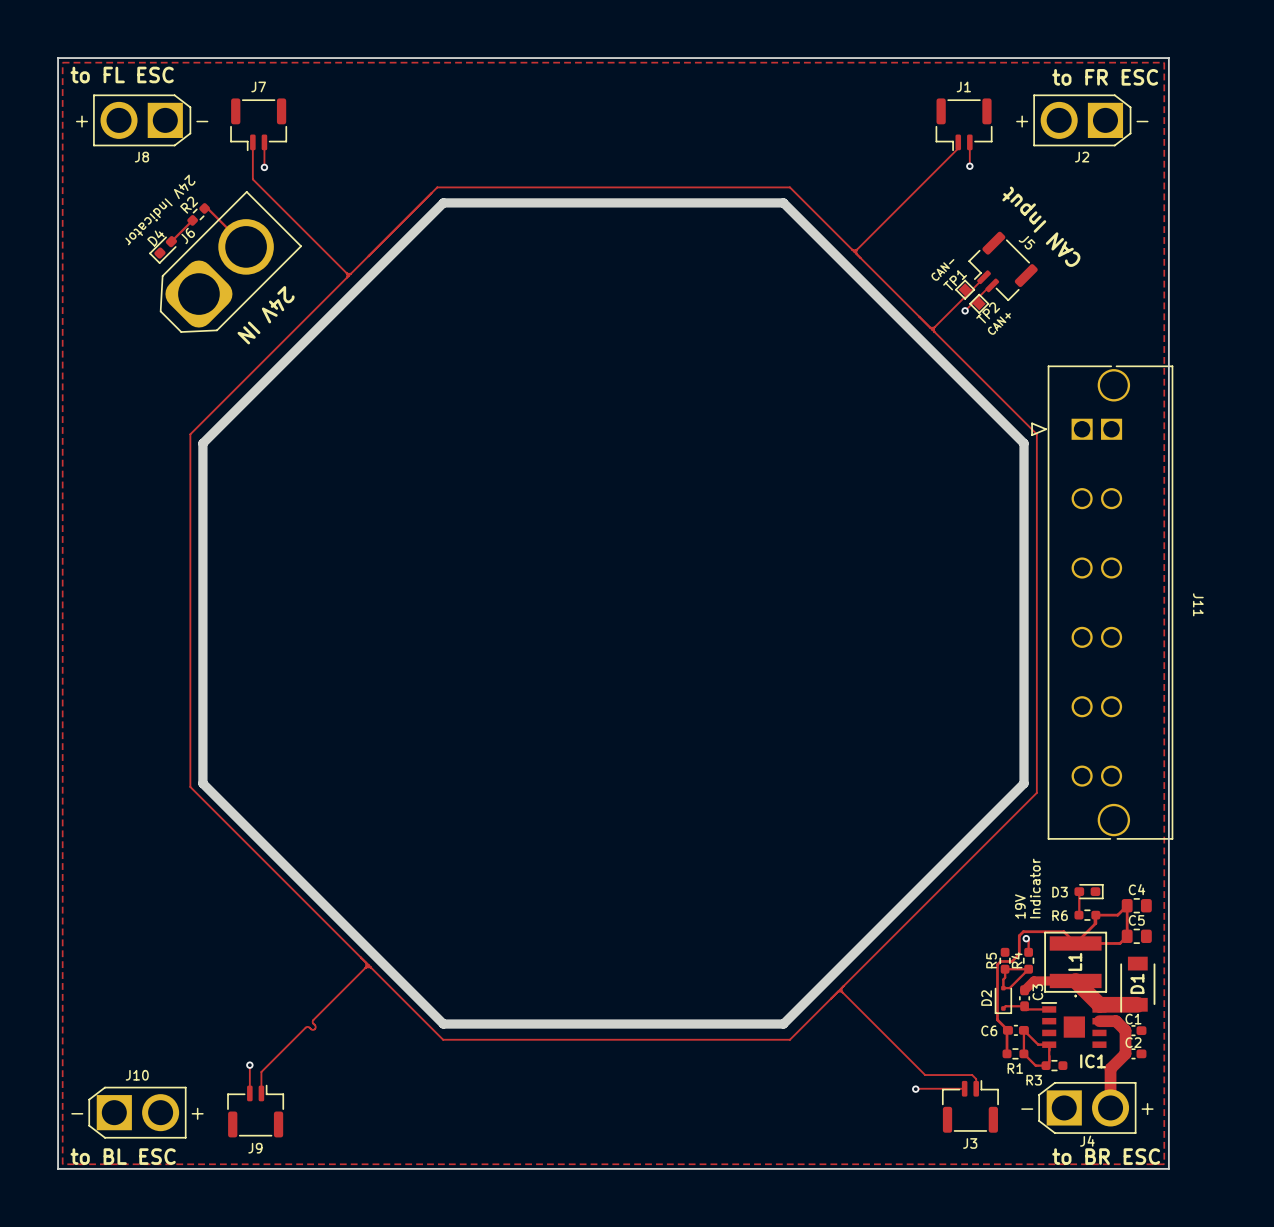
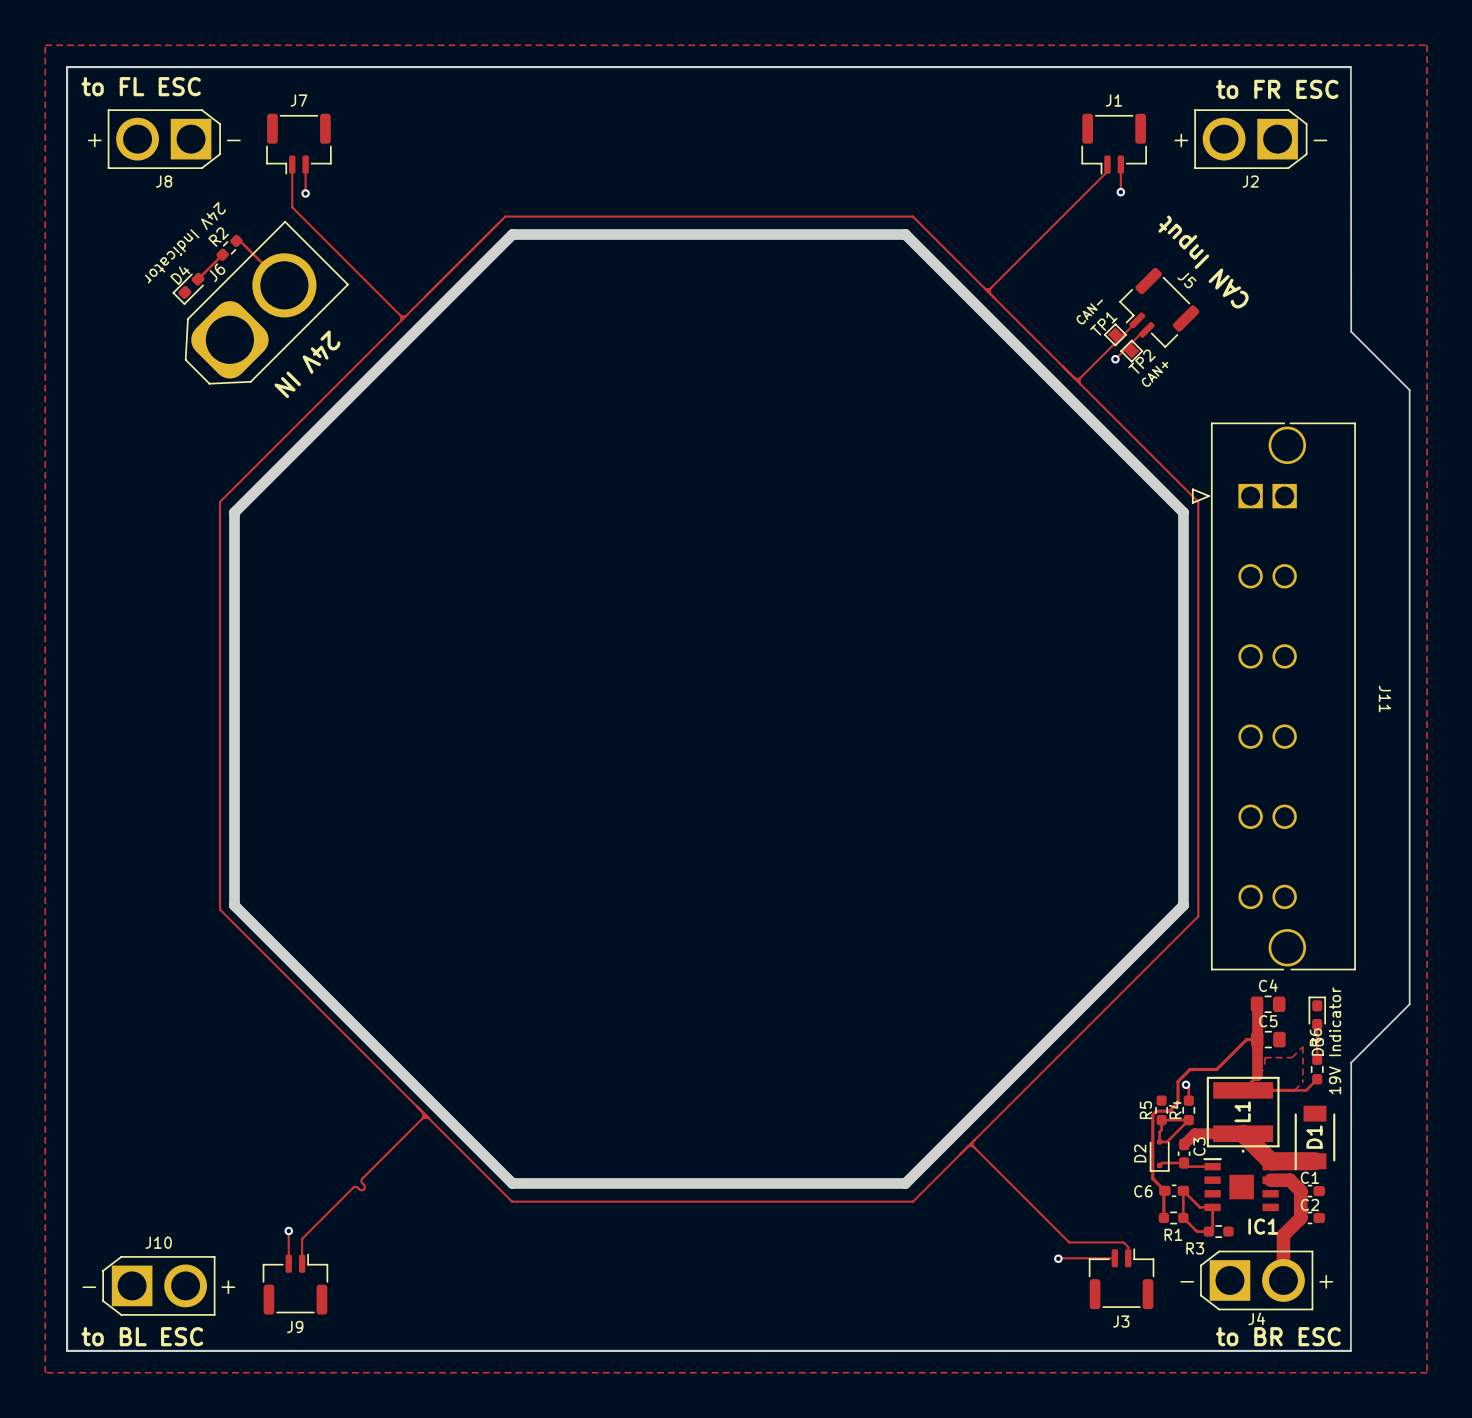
board edge: (1168, 58) (1168, 1168) -> (1350, 67) (1351, 331) (1409, 390) (1409, 1004) (1351, 1062) (1350, 1350)
zone outline: (62, 62) (1164, 62) (1164, 1164) (62, 1164) (62, 62) -> (45, 45) (45, 1372) (1427, 1372) (1427, 45) (45, 45)
track: none -> (1257, 1004) (1257, 1076)
track: none -> (1317, 1024) (1317, 1059)
text: Indicator (1035, 888) -> none
track: (1079, 891) (1078, 915) -> none
D3 rotation: 0° (1088, 891) -> 90° counterclockwise (1317, 1013)
D3 position: (1088, 891) -> (1317, 1013)
text: none -> 19V Indicator (1335, 1040)
C4 position: (1136, 905) -> (1268, 1004)
text: 19V (1020, 906) -> none
R6 rotation: 0° (1087, 915) -> 90° clockwise (1317, 1069)
R6 position: (1087, 915) -> (1317, 1069)
track: (1088, 931) (1095, 923) (1095, 915) (1117, 915) (1127, 905) (1127, 936) (1119, 943) -> (1317, 1079) (1306, 1090) (1294, 1090)
track: (1019, 935) (1023, 931) (1063, 931) (1075, 943) -> (1178, 1081) (1190, 1069) (1216, 1069) (1246, 1039) (1257, 1039)
C5 position: (1136, 936) -> (1268, 1039)

